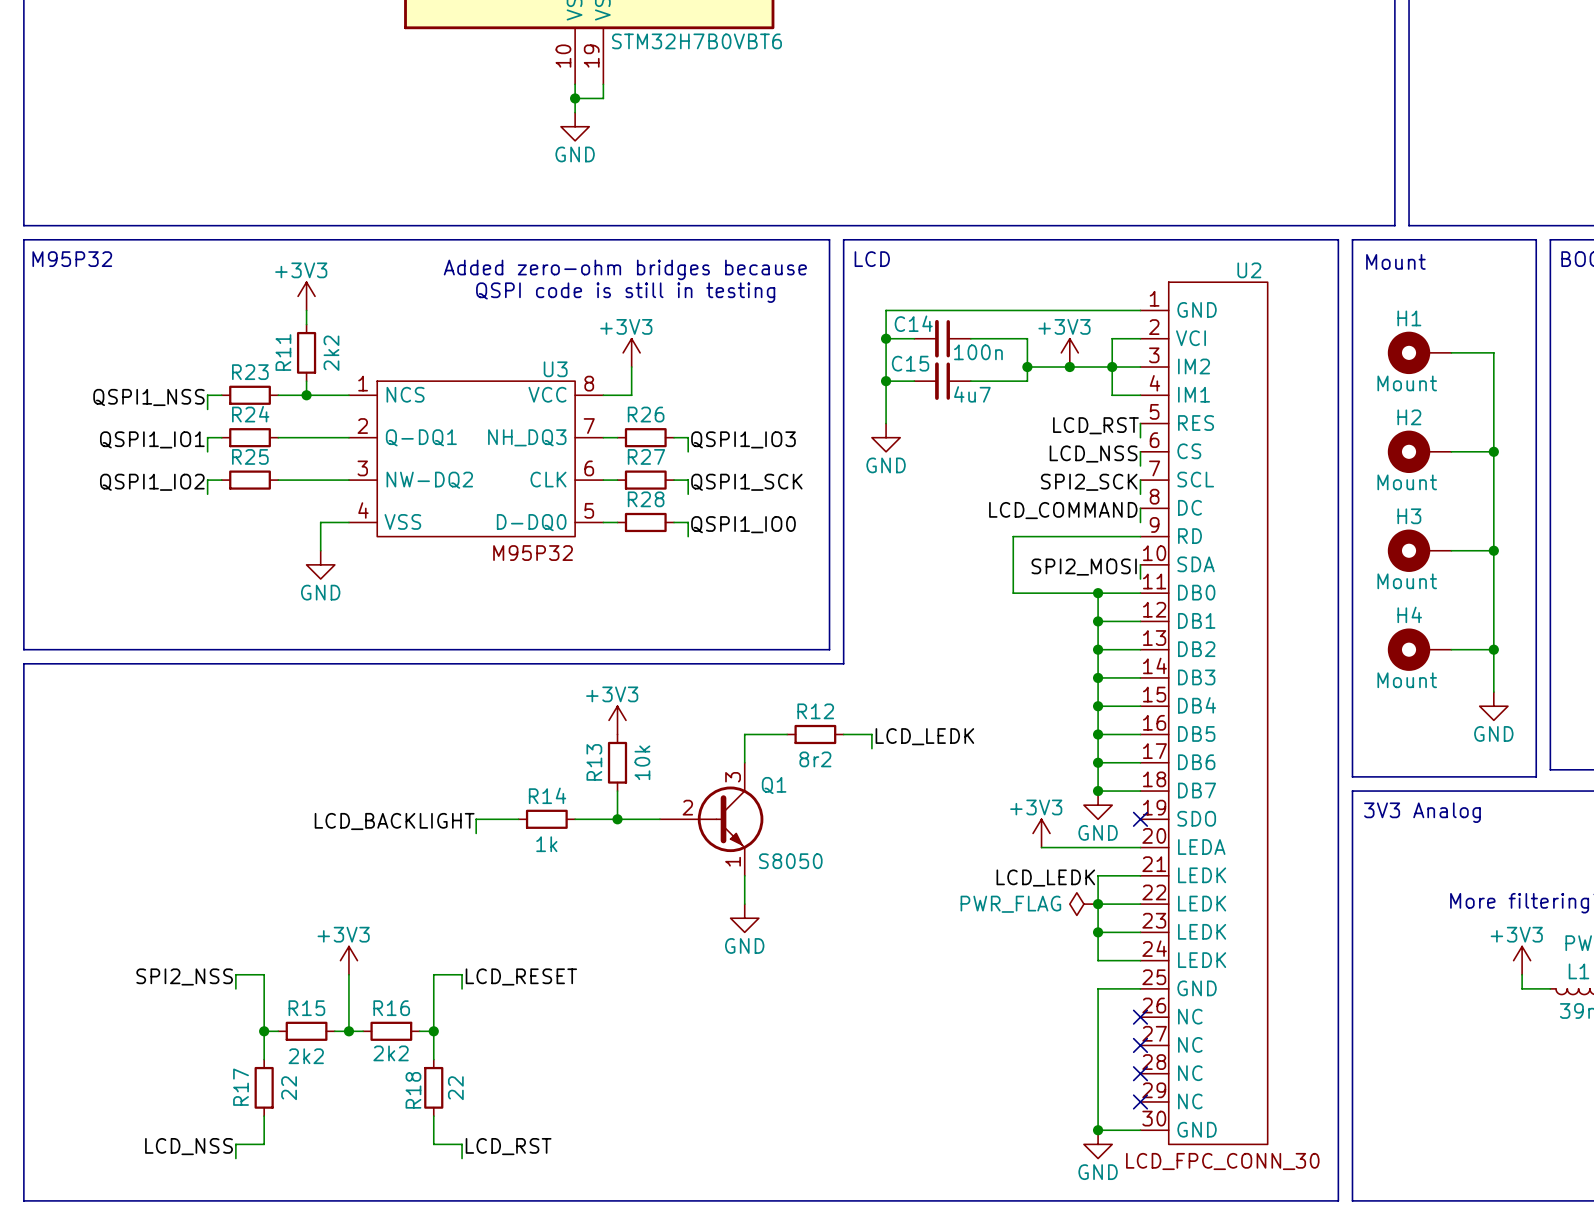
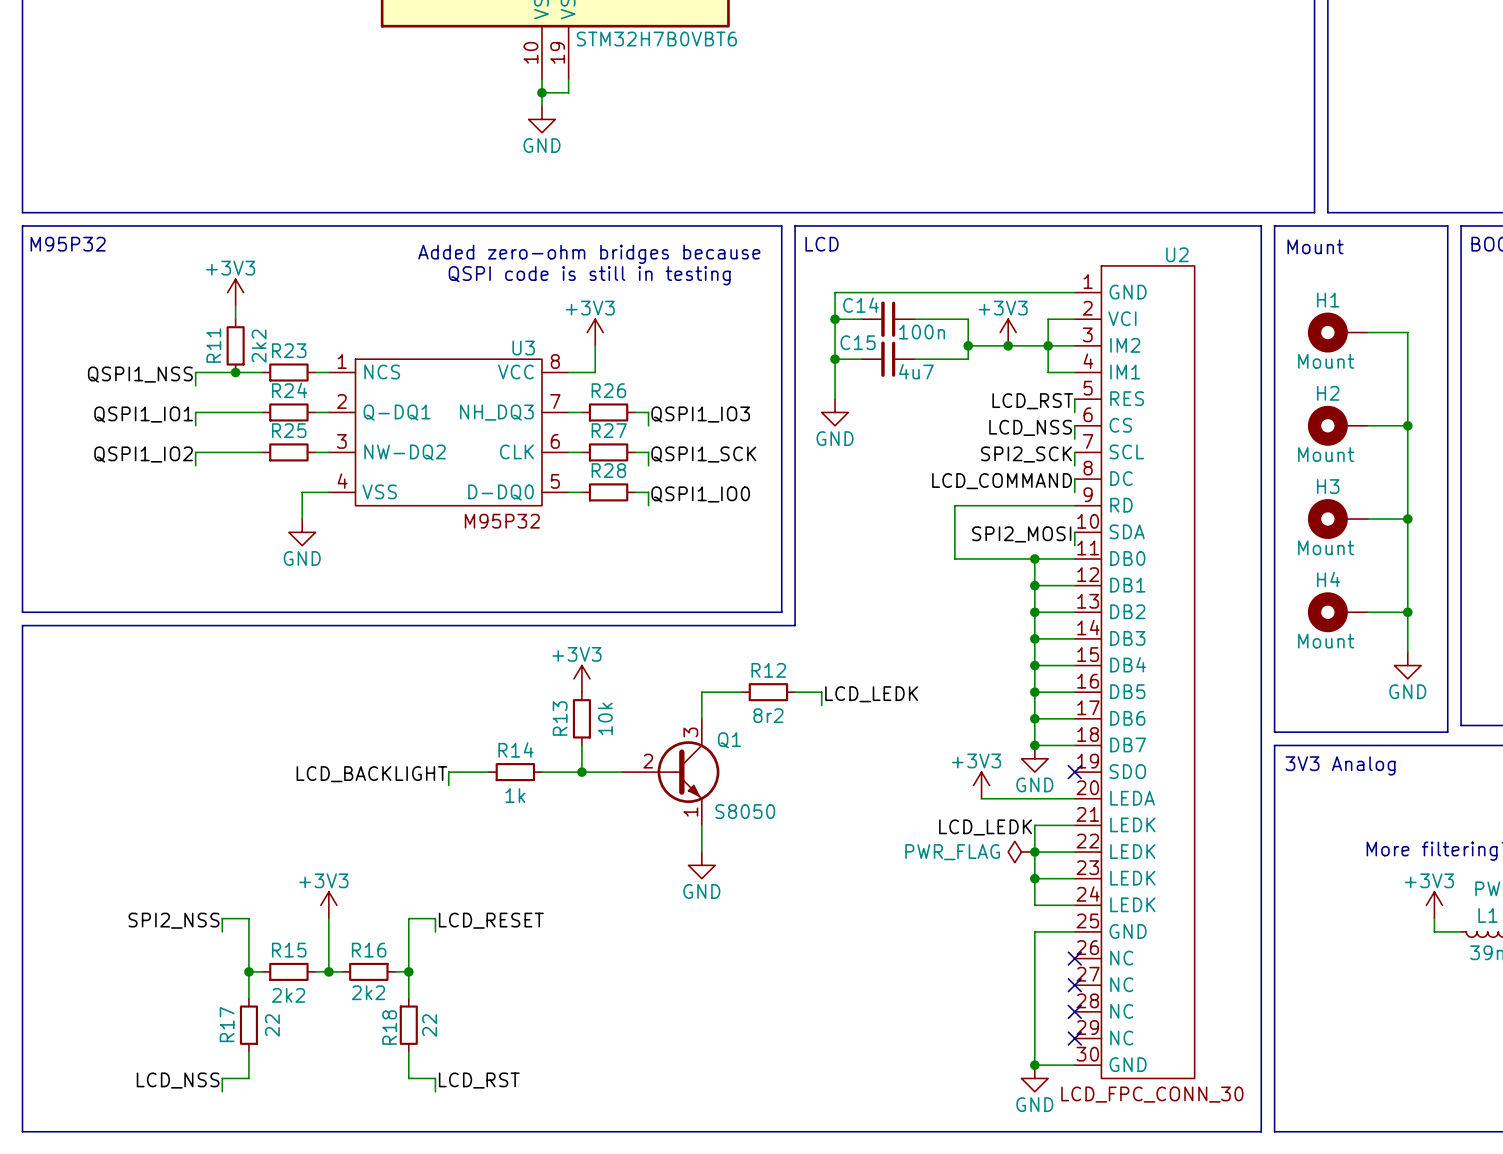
power symbol position: +3V3 (306, 296) -> +3V3 (235, 292)
wire: (306, 310) (306, 324) -> (235, 305) (235, 319)
R11 position: (306, 352) -> (235, 345)
wire: (306, 381) (306, 395) -> none
R23 position: (250, 395) -> (288, 372)
wire: (278, 395) (334, 395) -> (262, 372) (208, 372)
junction position: (306, 395) -> (235, 372)
R24 position: (250, 437) -> (288, 412)
wire: (278, 437) (334, 437) -> (262, 412) (208, 412)
R25 position: (250, 480) -> (288, 452)
wire: (278, 480) (334, 480) -> (262, 452) (208, 452)

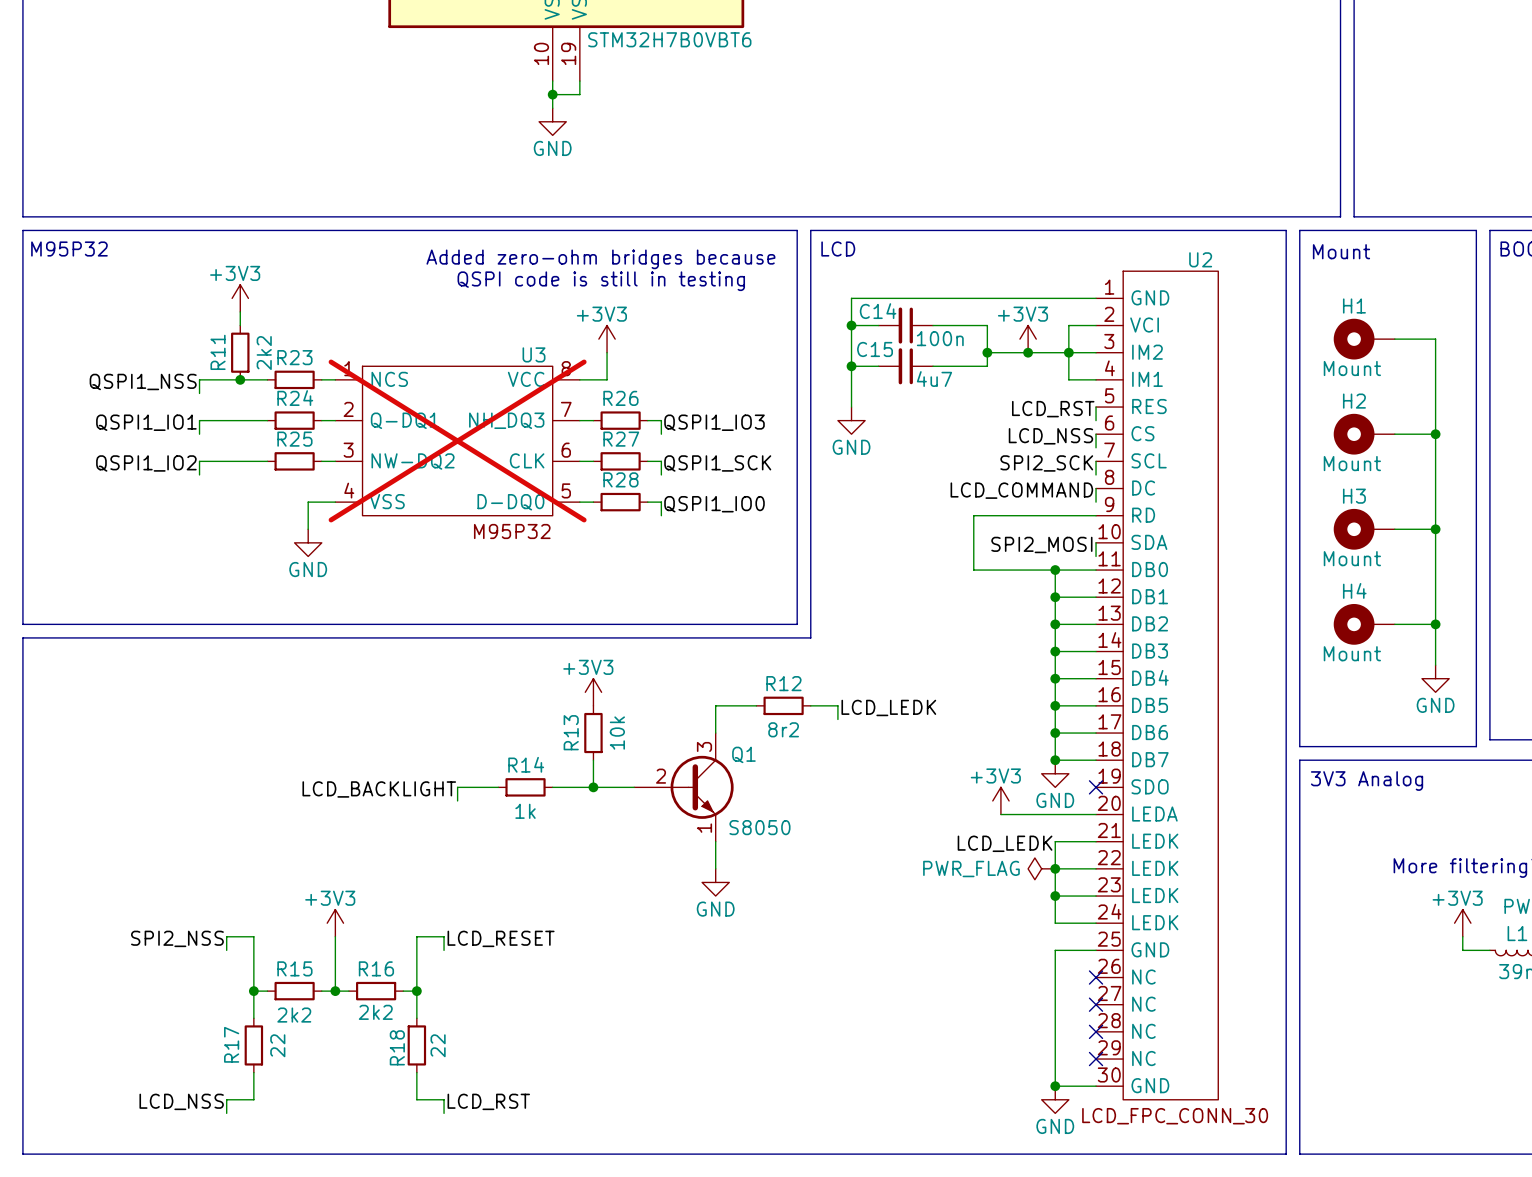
U3 do-not-place cross: none -> (457, 440)

